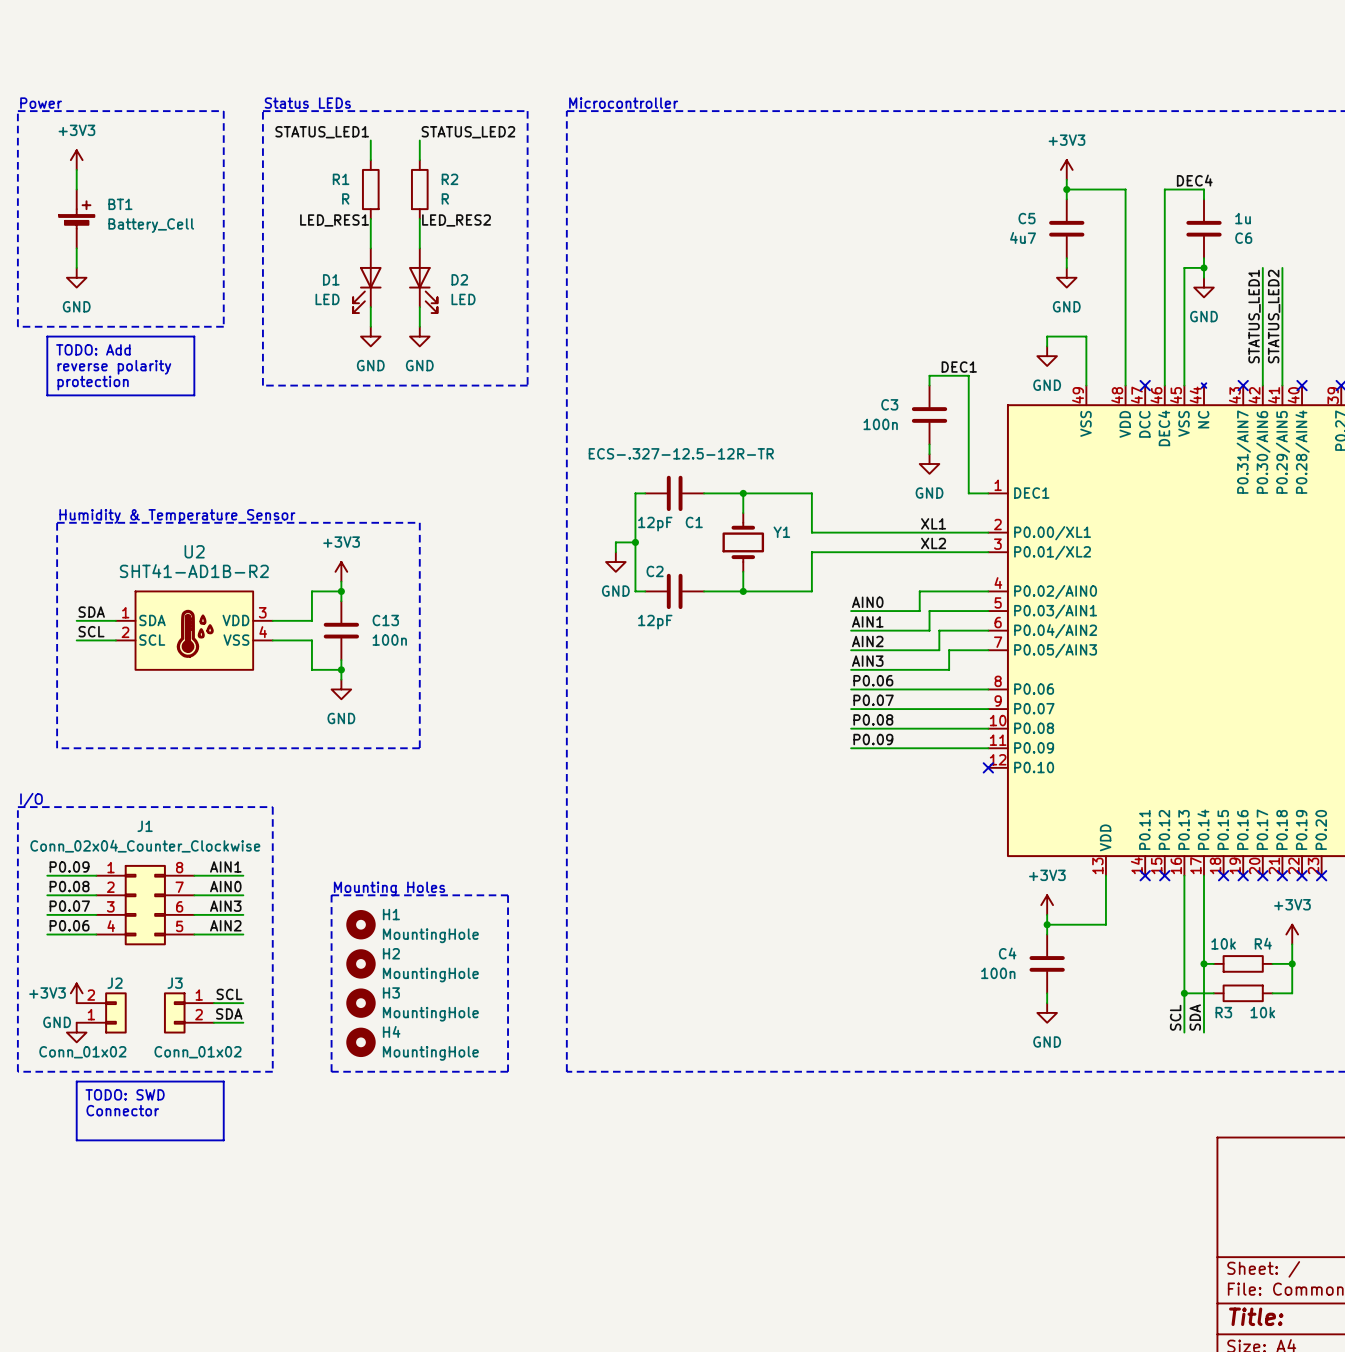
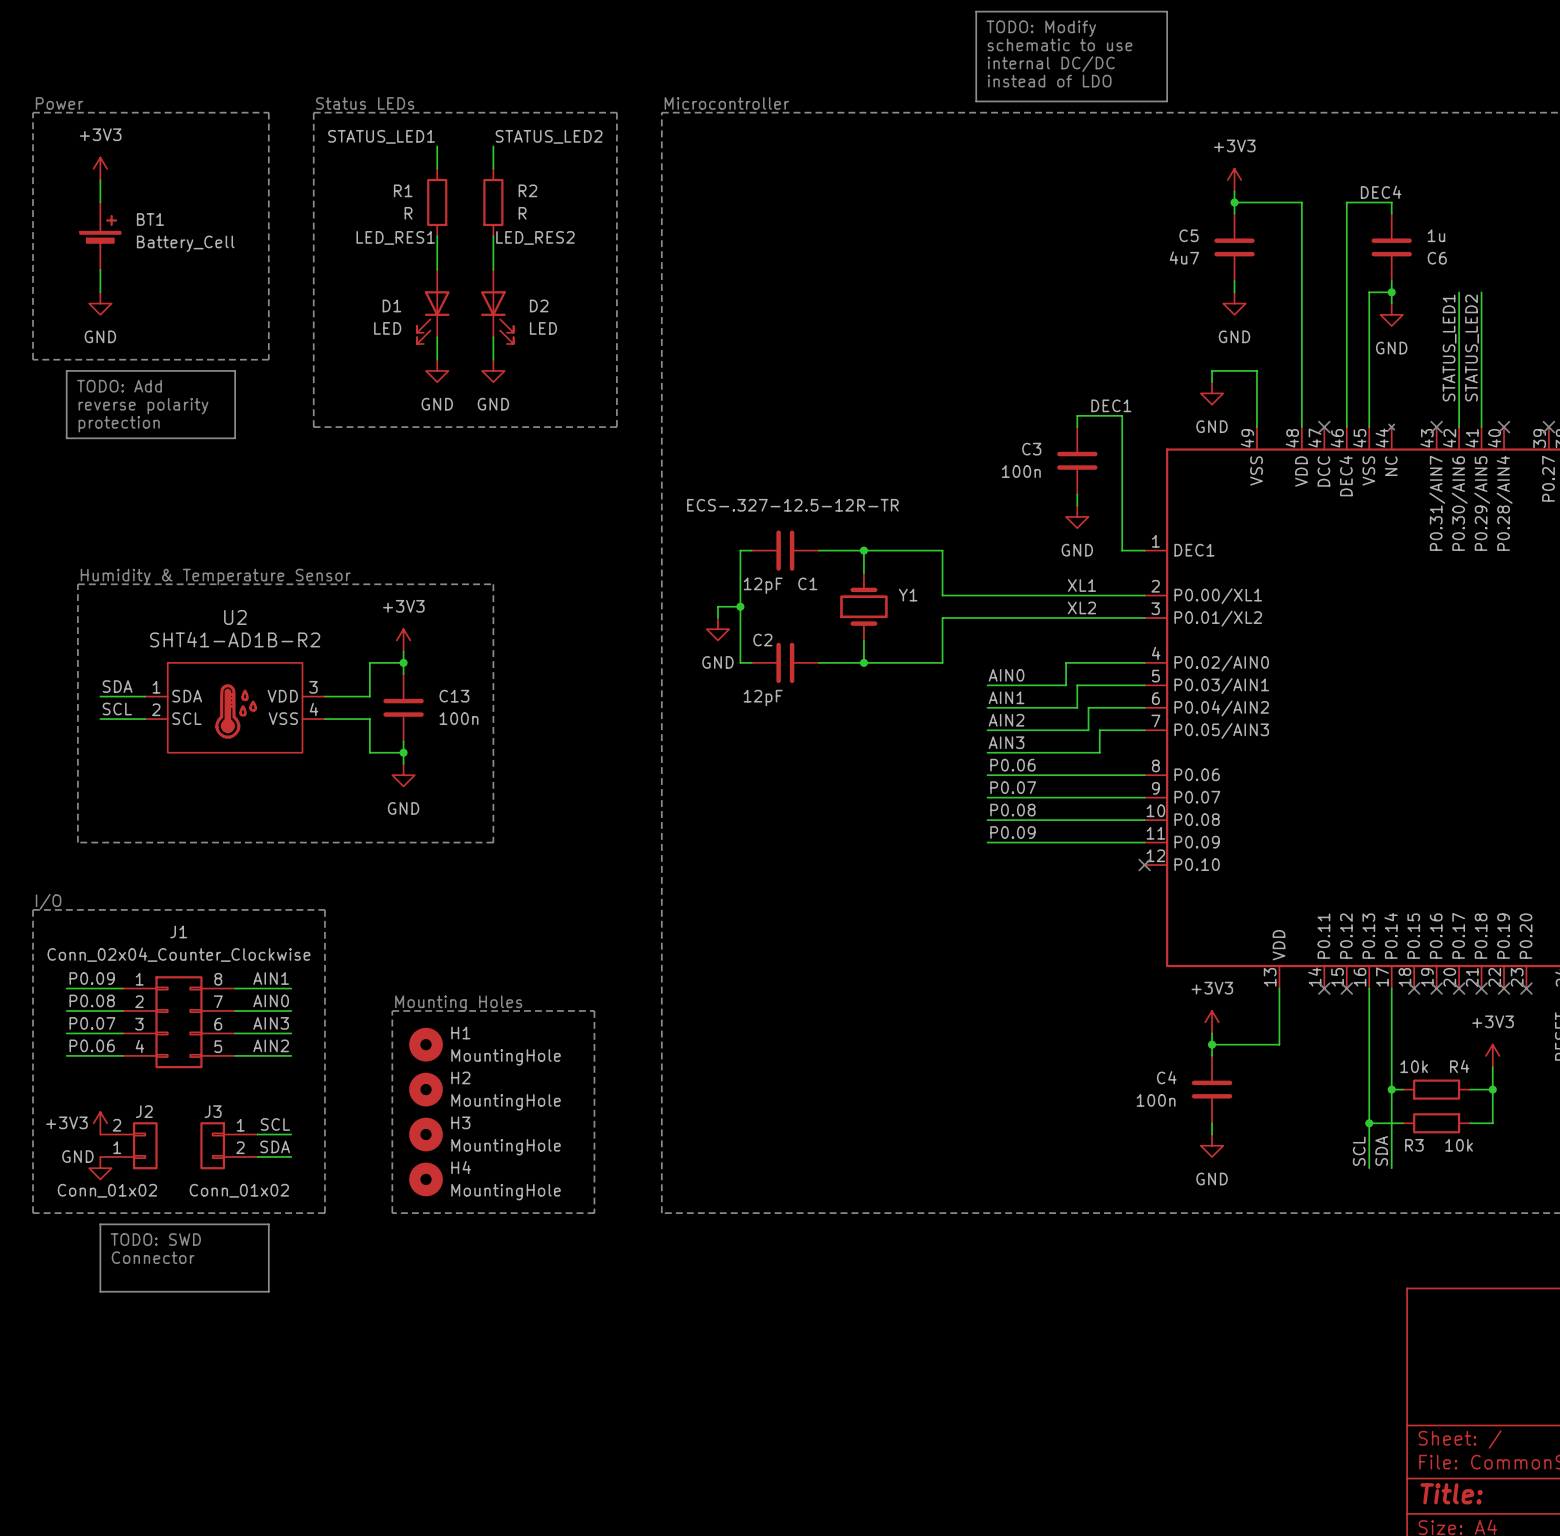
line: none -> (976, 11) (1167, 11) (1167, 101) (976, 101) (976, 11)
text: none -> TODO: Modify (1041, 28)
text: none -> schematic to use (1060, 44)
text: none -> internal DC/DC (1051, 64)
text: none -> instead of LDO (1049, 81)

